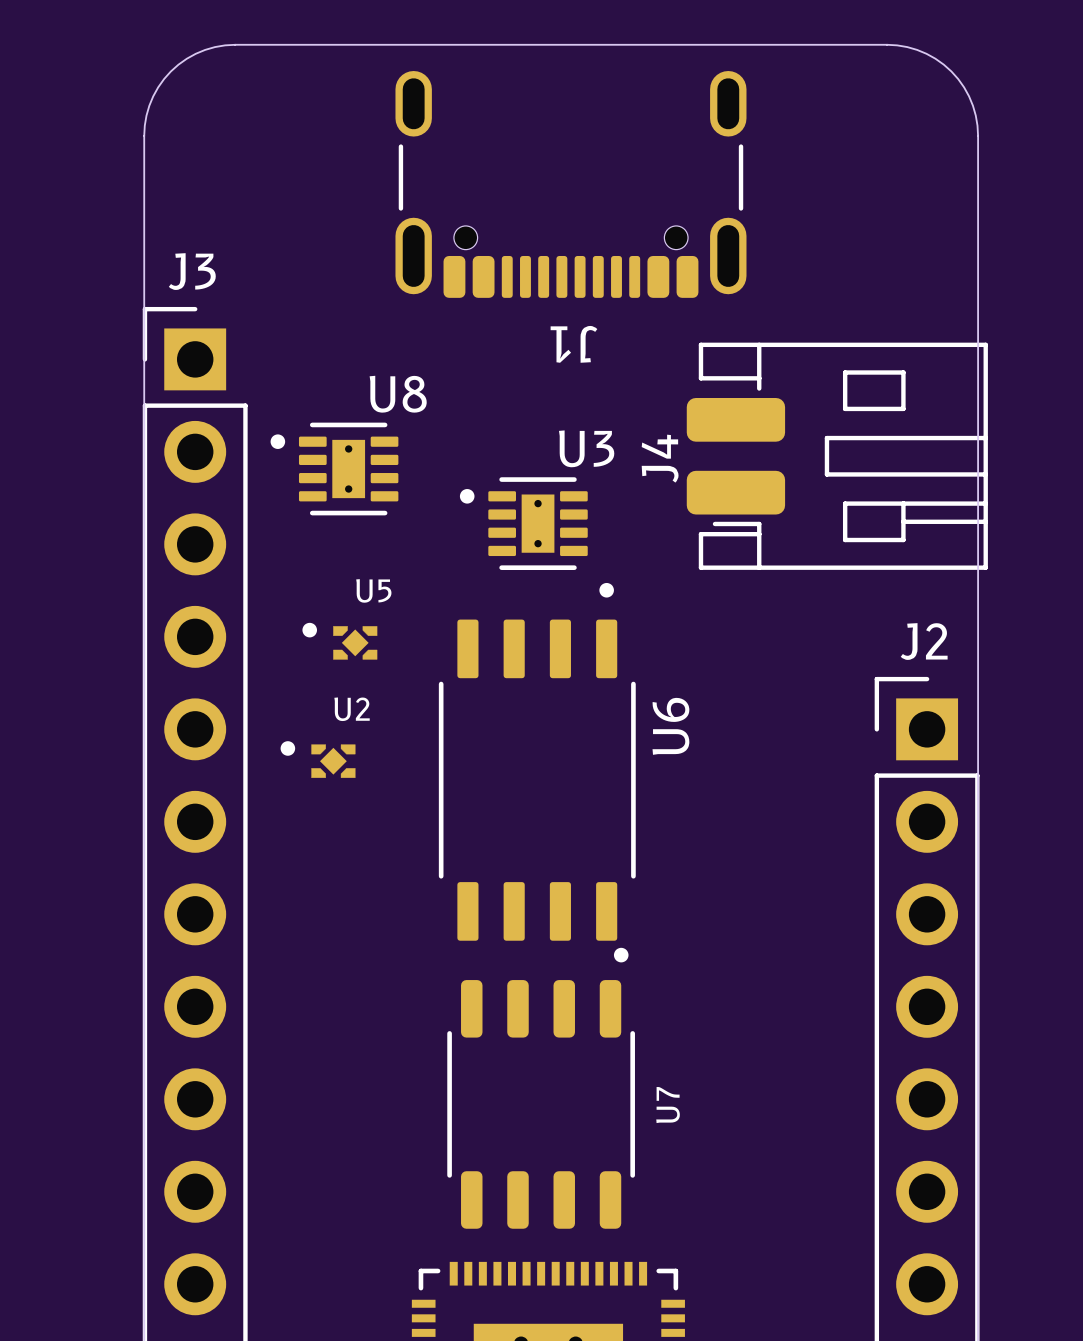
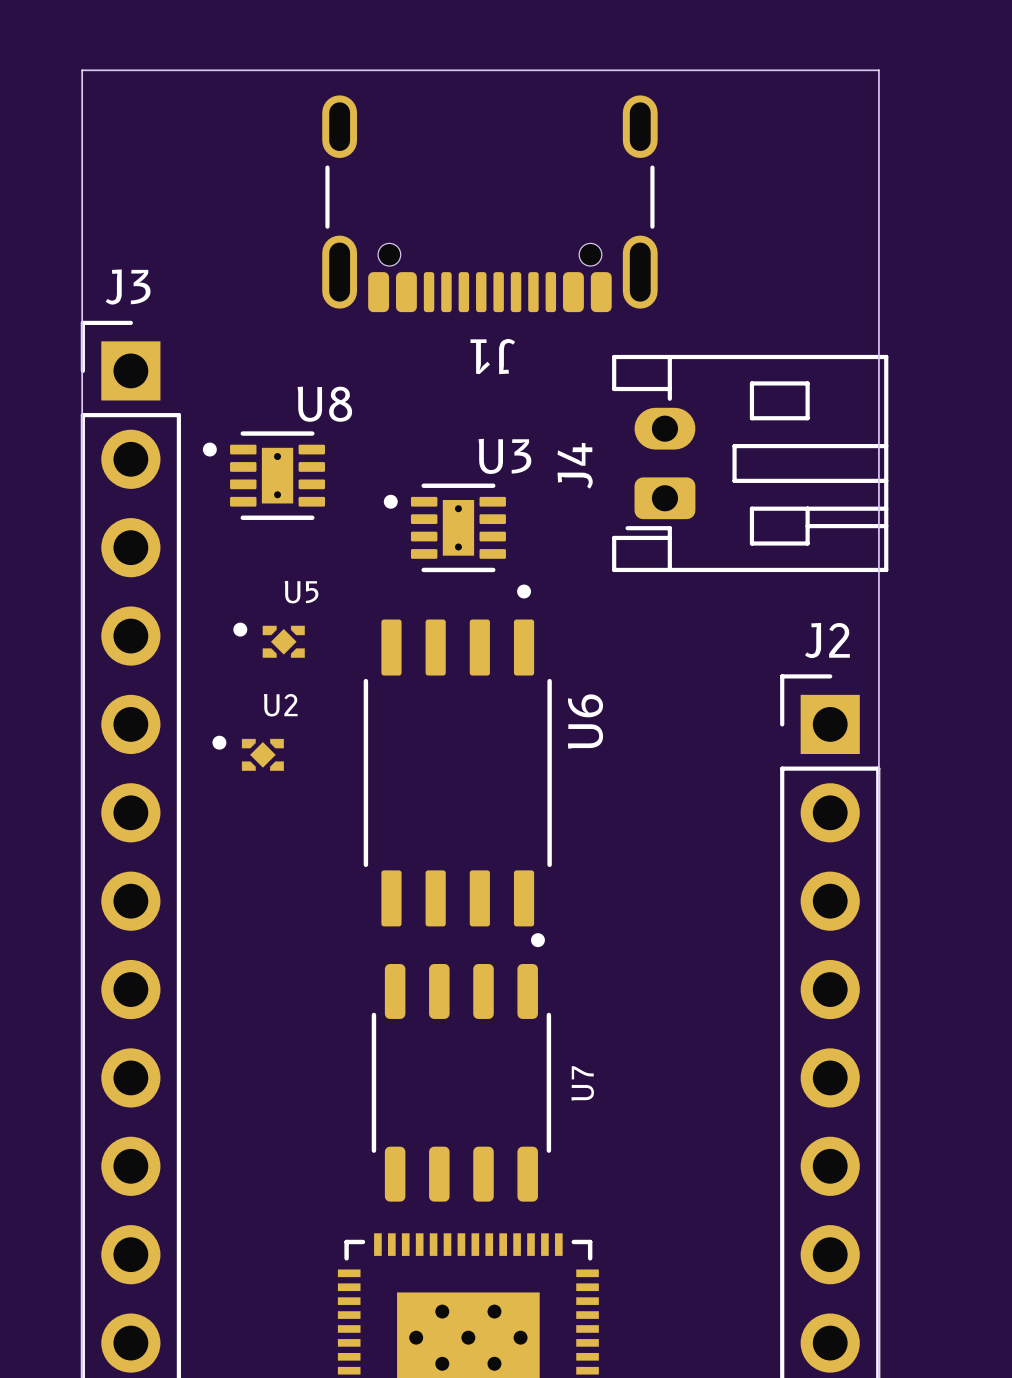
board edge: (235, 44) (215, 47) (195, 53) (170, 71) (158, 87) (149, 105) (144, 135) -> (169, 70) (82, 70) (82, 157)
board edge: (887, 44) (917, 49) (935, 58) (951, 71) (969, 96) (975, 115) (978, 135) -> (791, 70) (878, 70) (878, 157)
J4 footprint: [686, 342, 988, 570] -> [612, 354, 889, 573]

